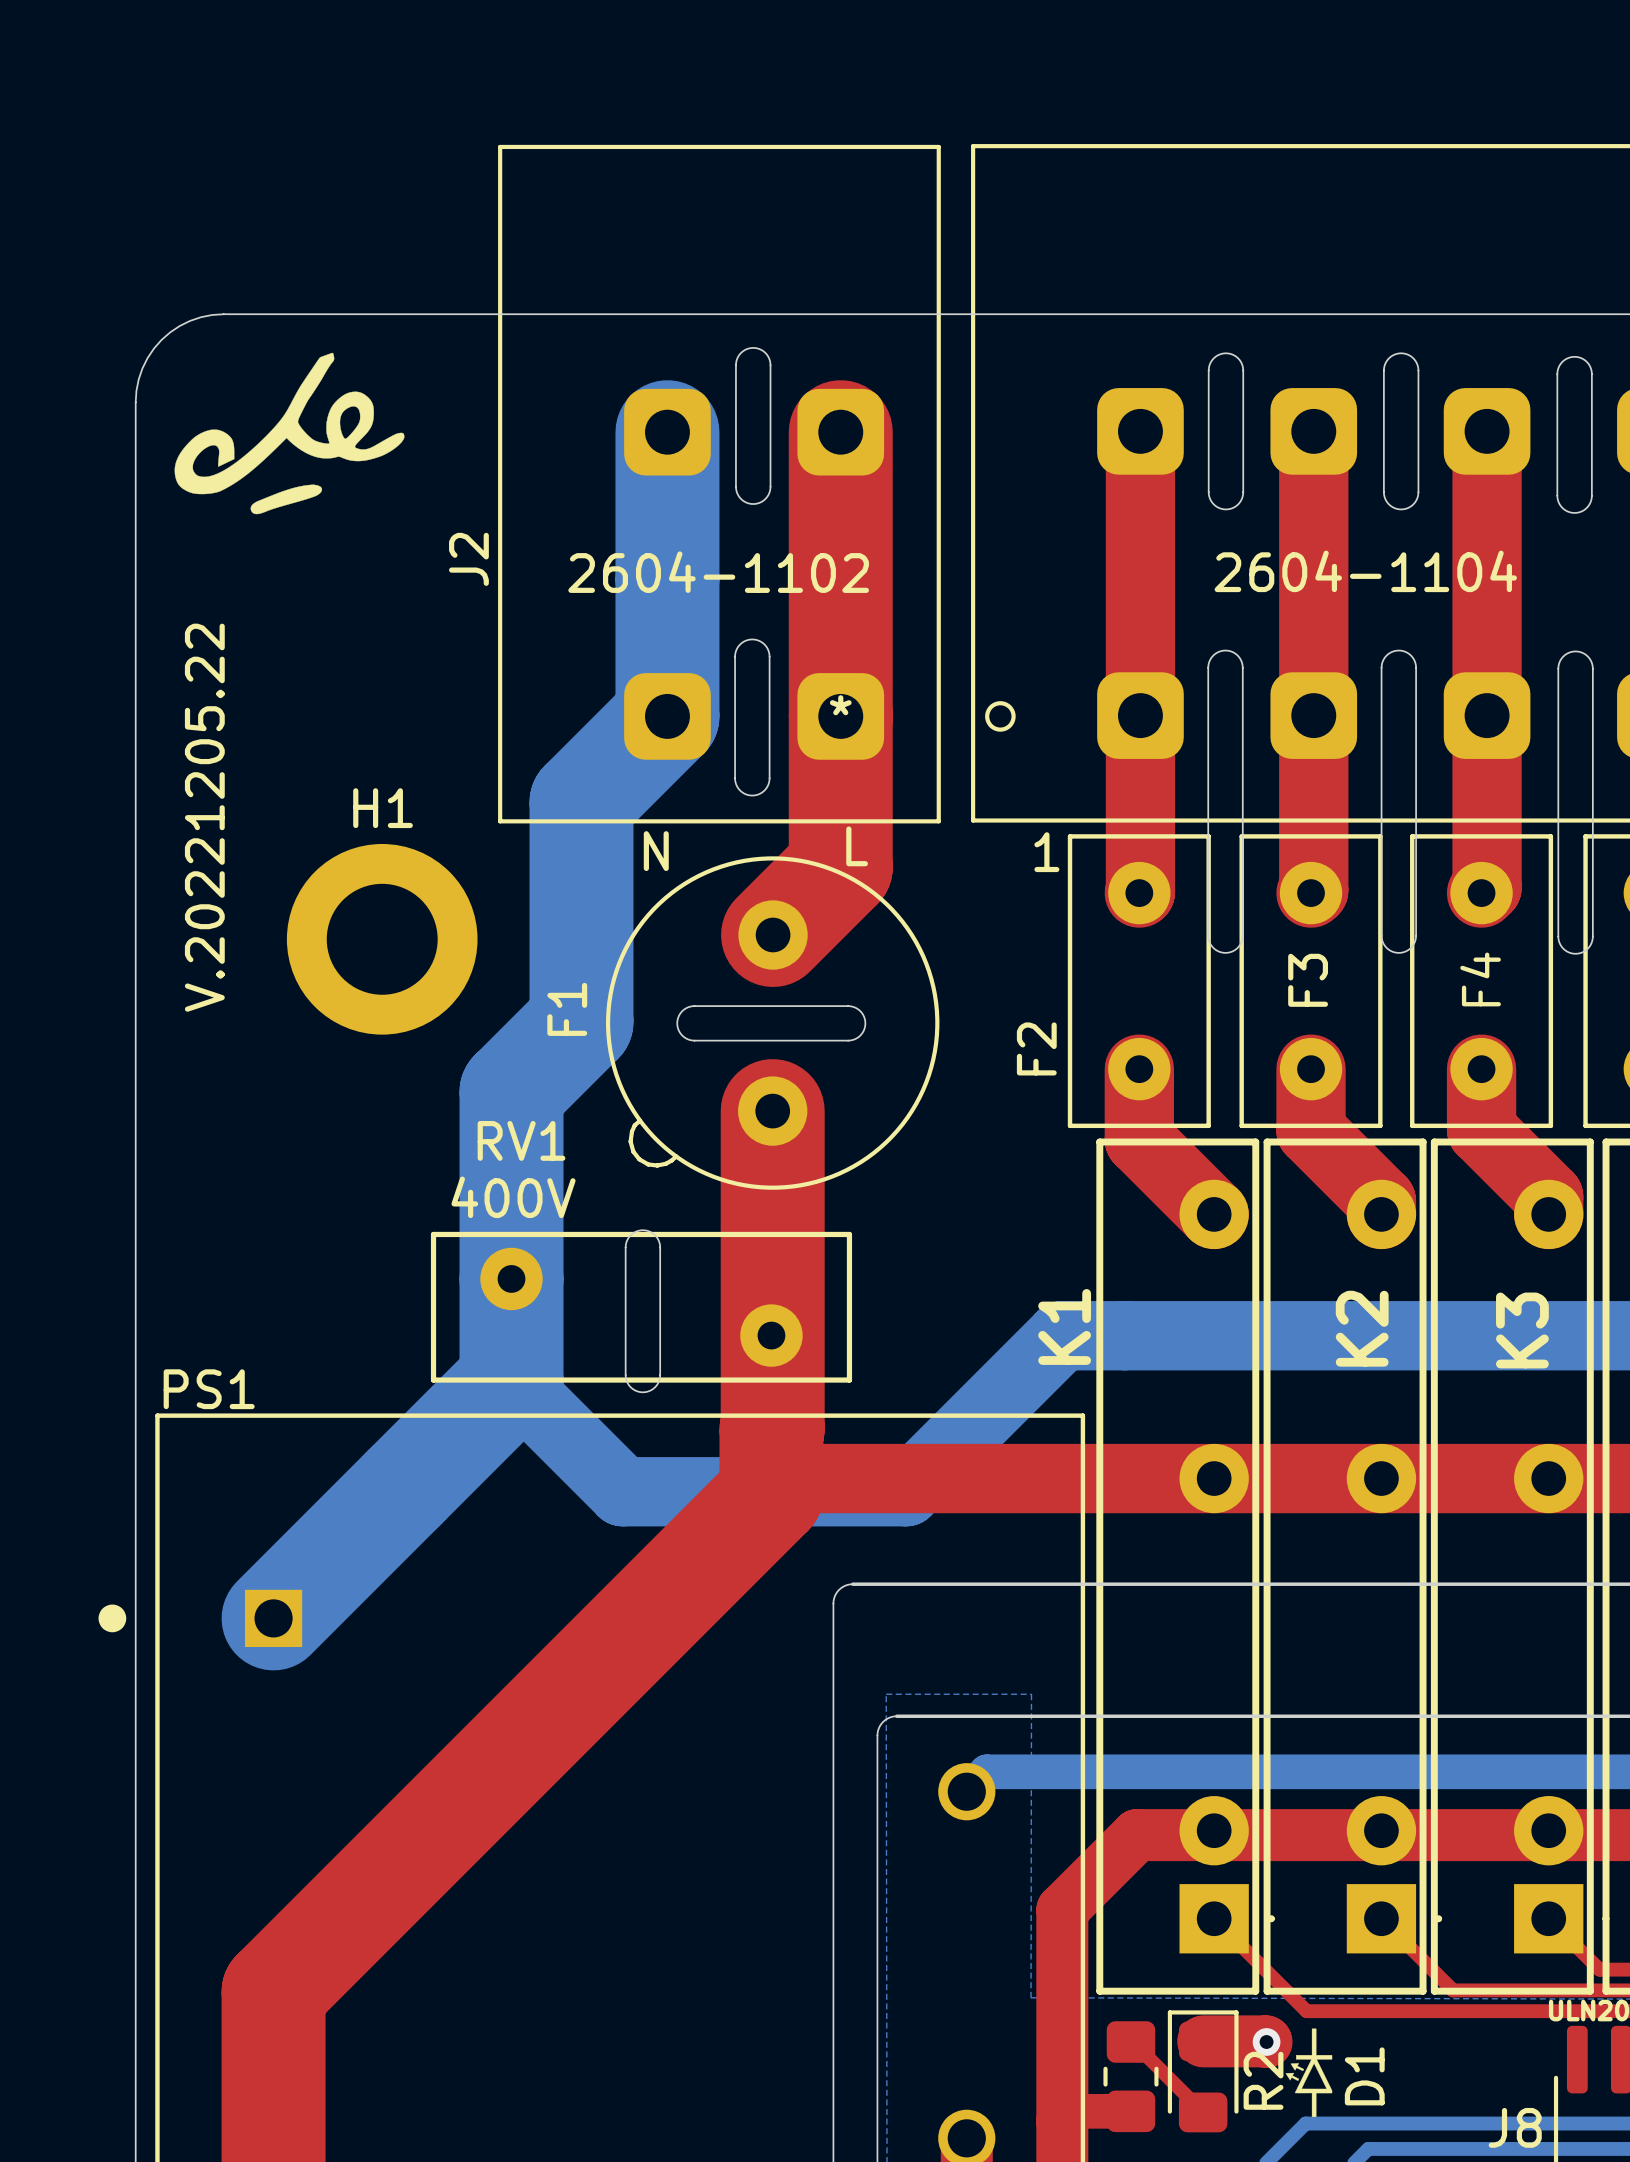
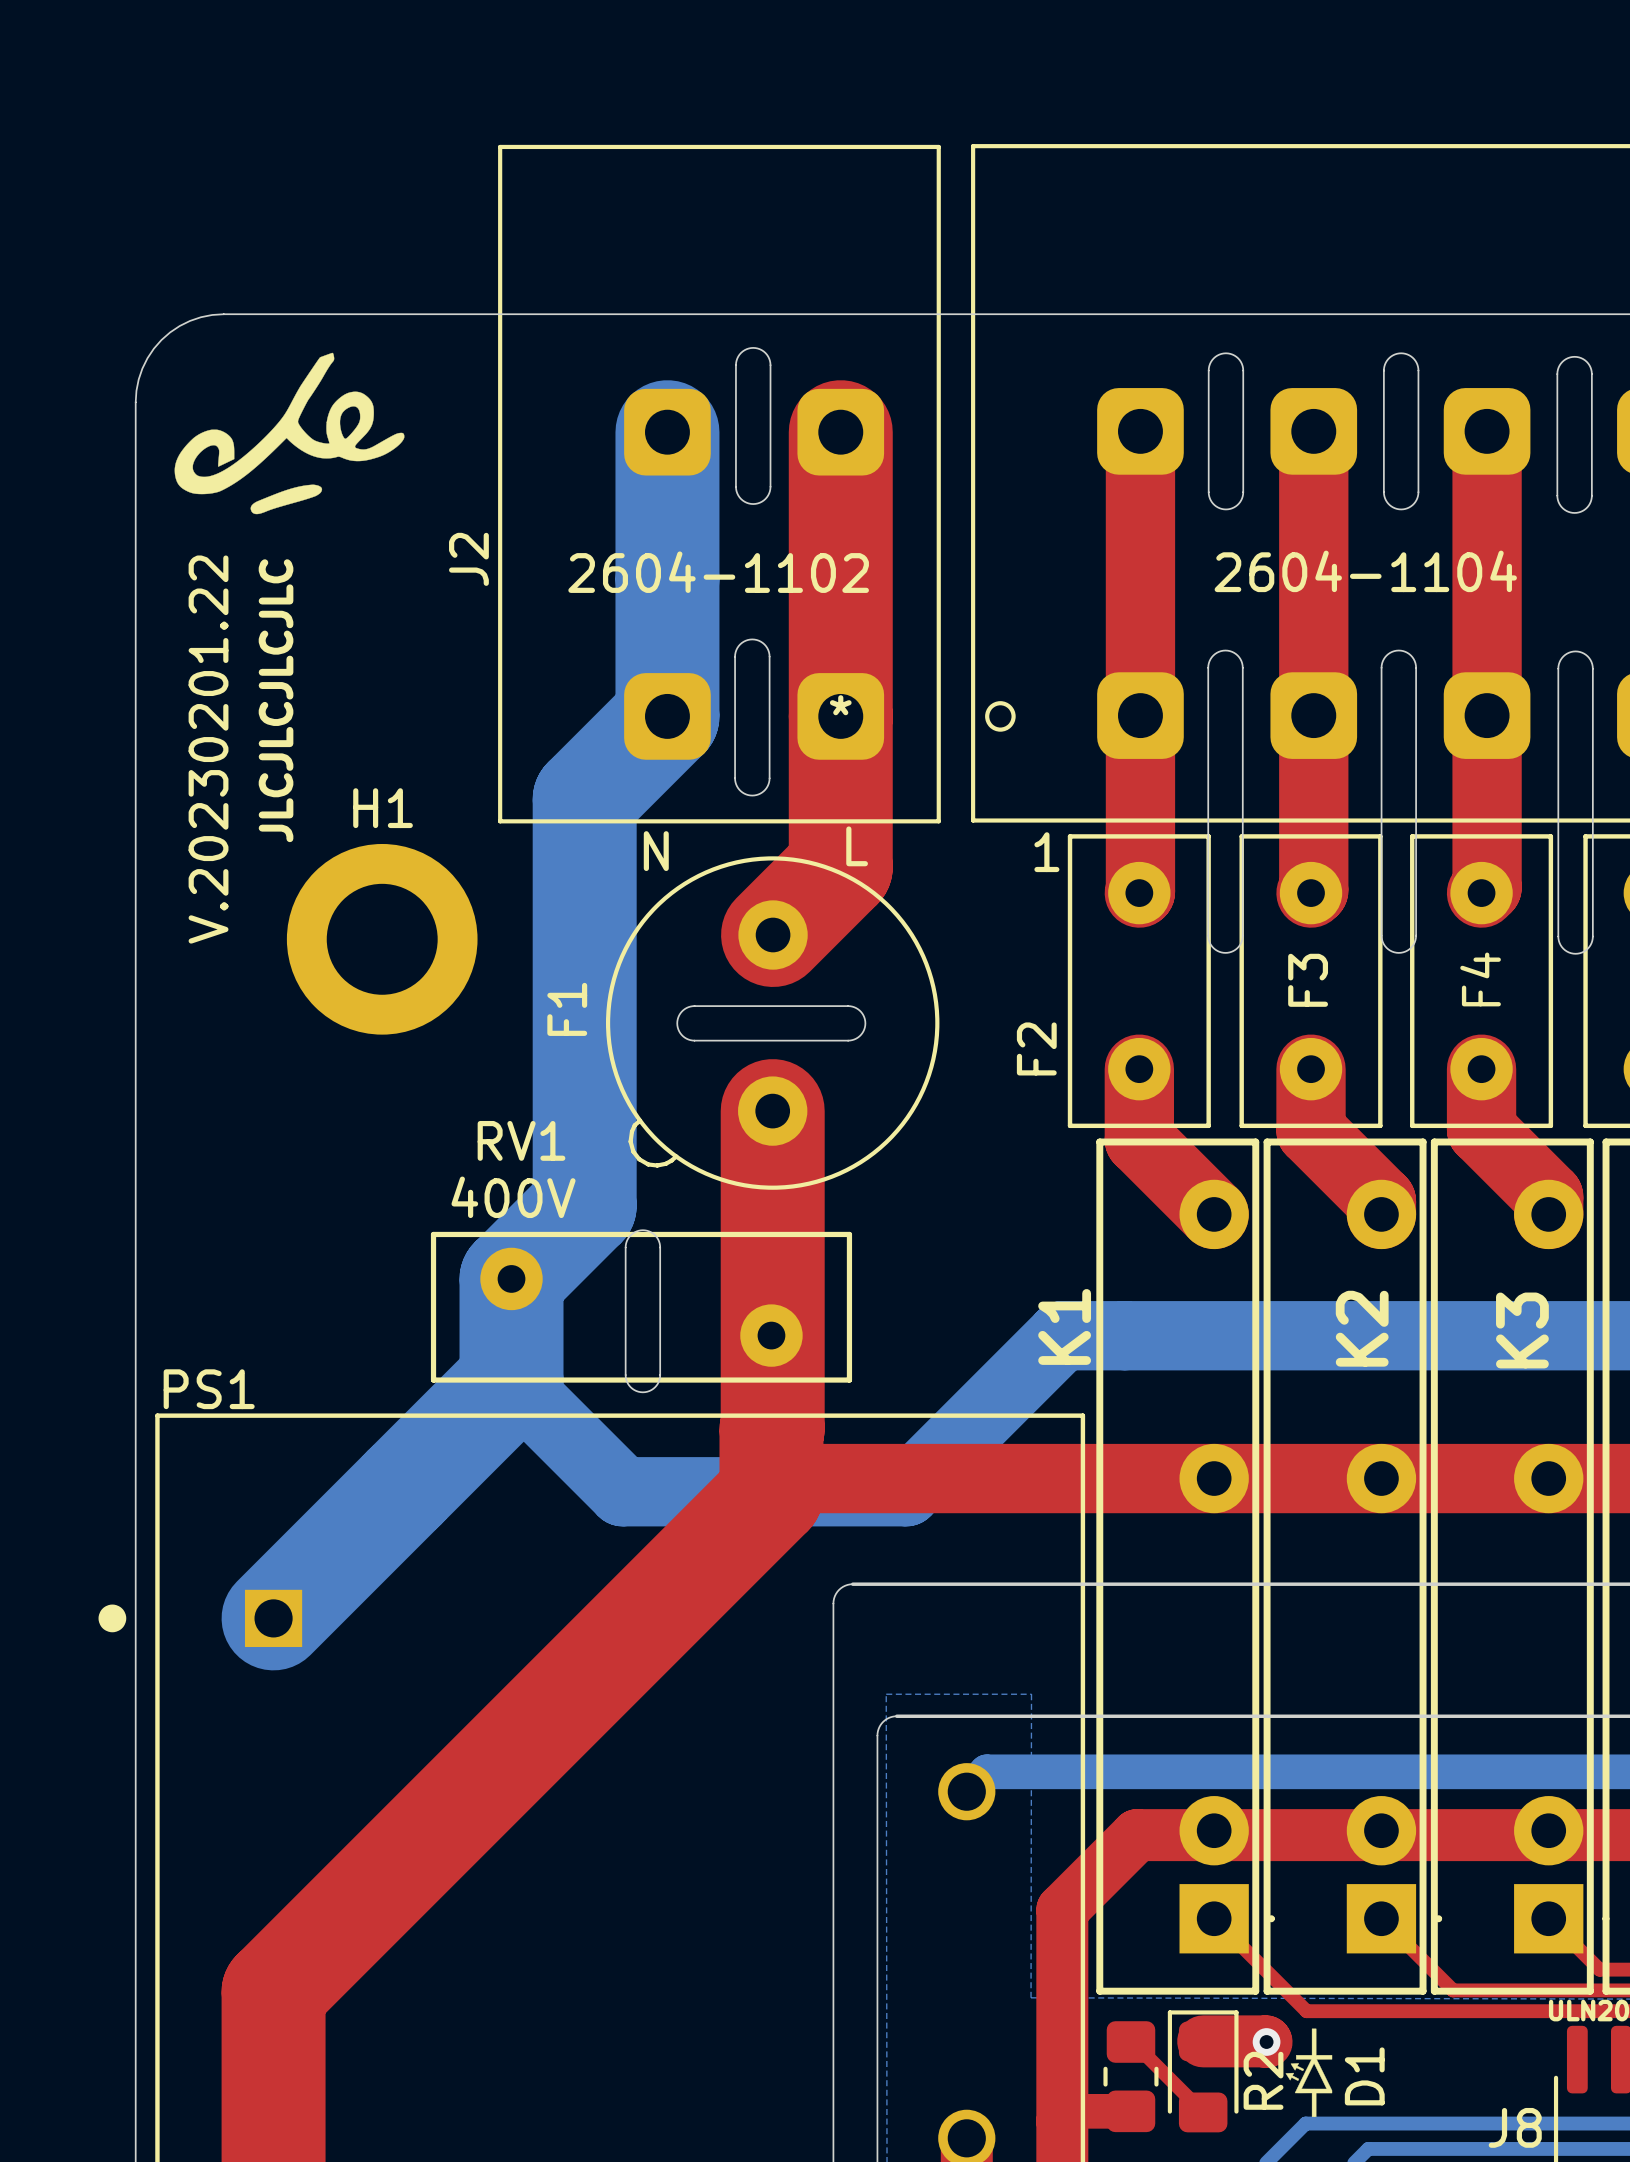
text: none -> JLCJLCJLCJLC (276, 700)
bottom track: (584, 799) (581, 802) (581, 1021) (511, 1091) (511, 1278) -> (584, 799) (584, 1205) (511, 1278)
text: V.20221205.22 (204, 817) -> V.20230201.22 (208, 749)

